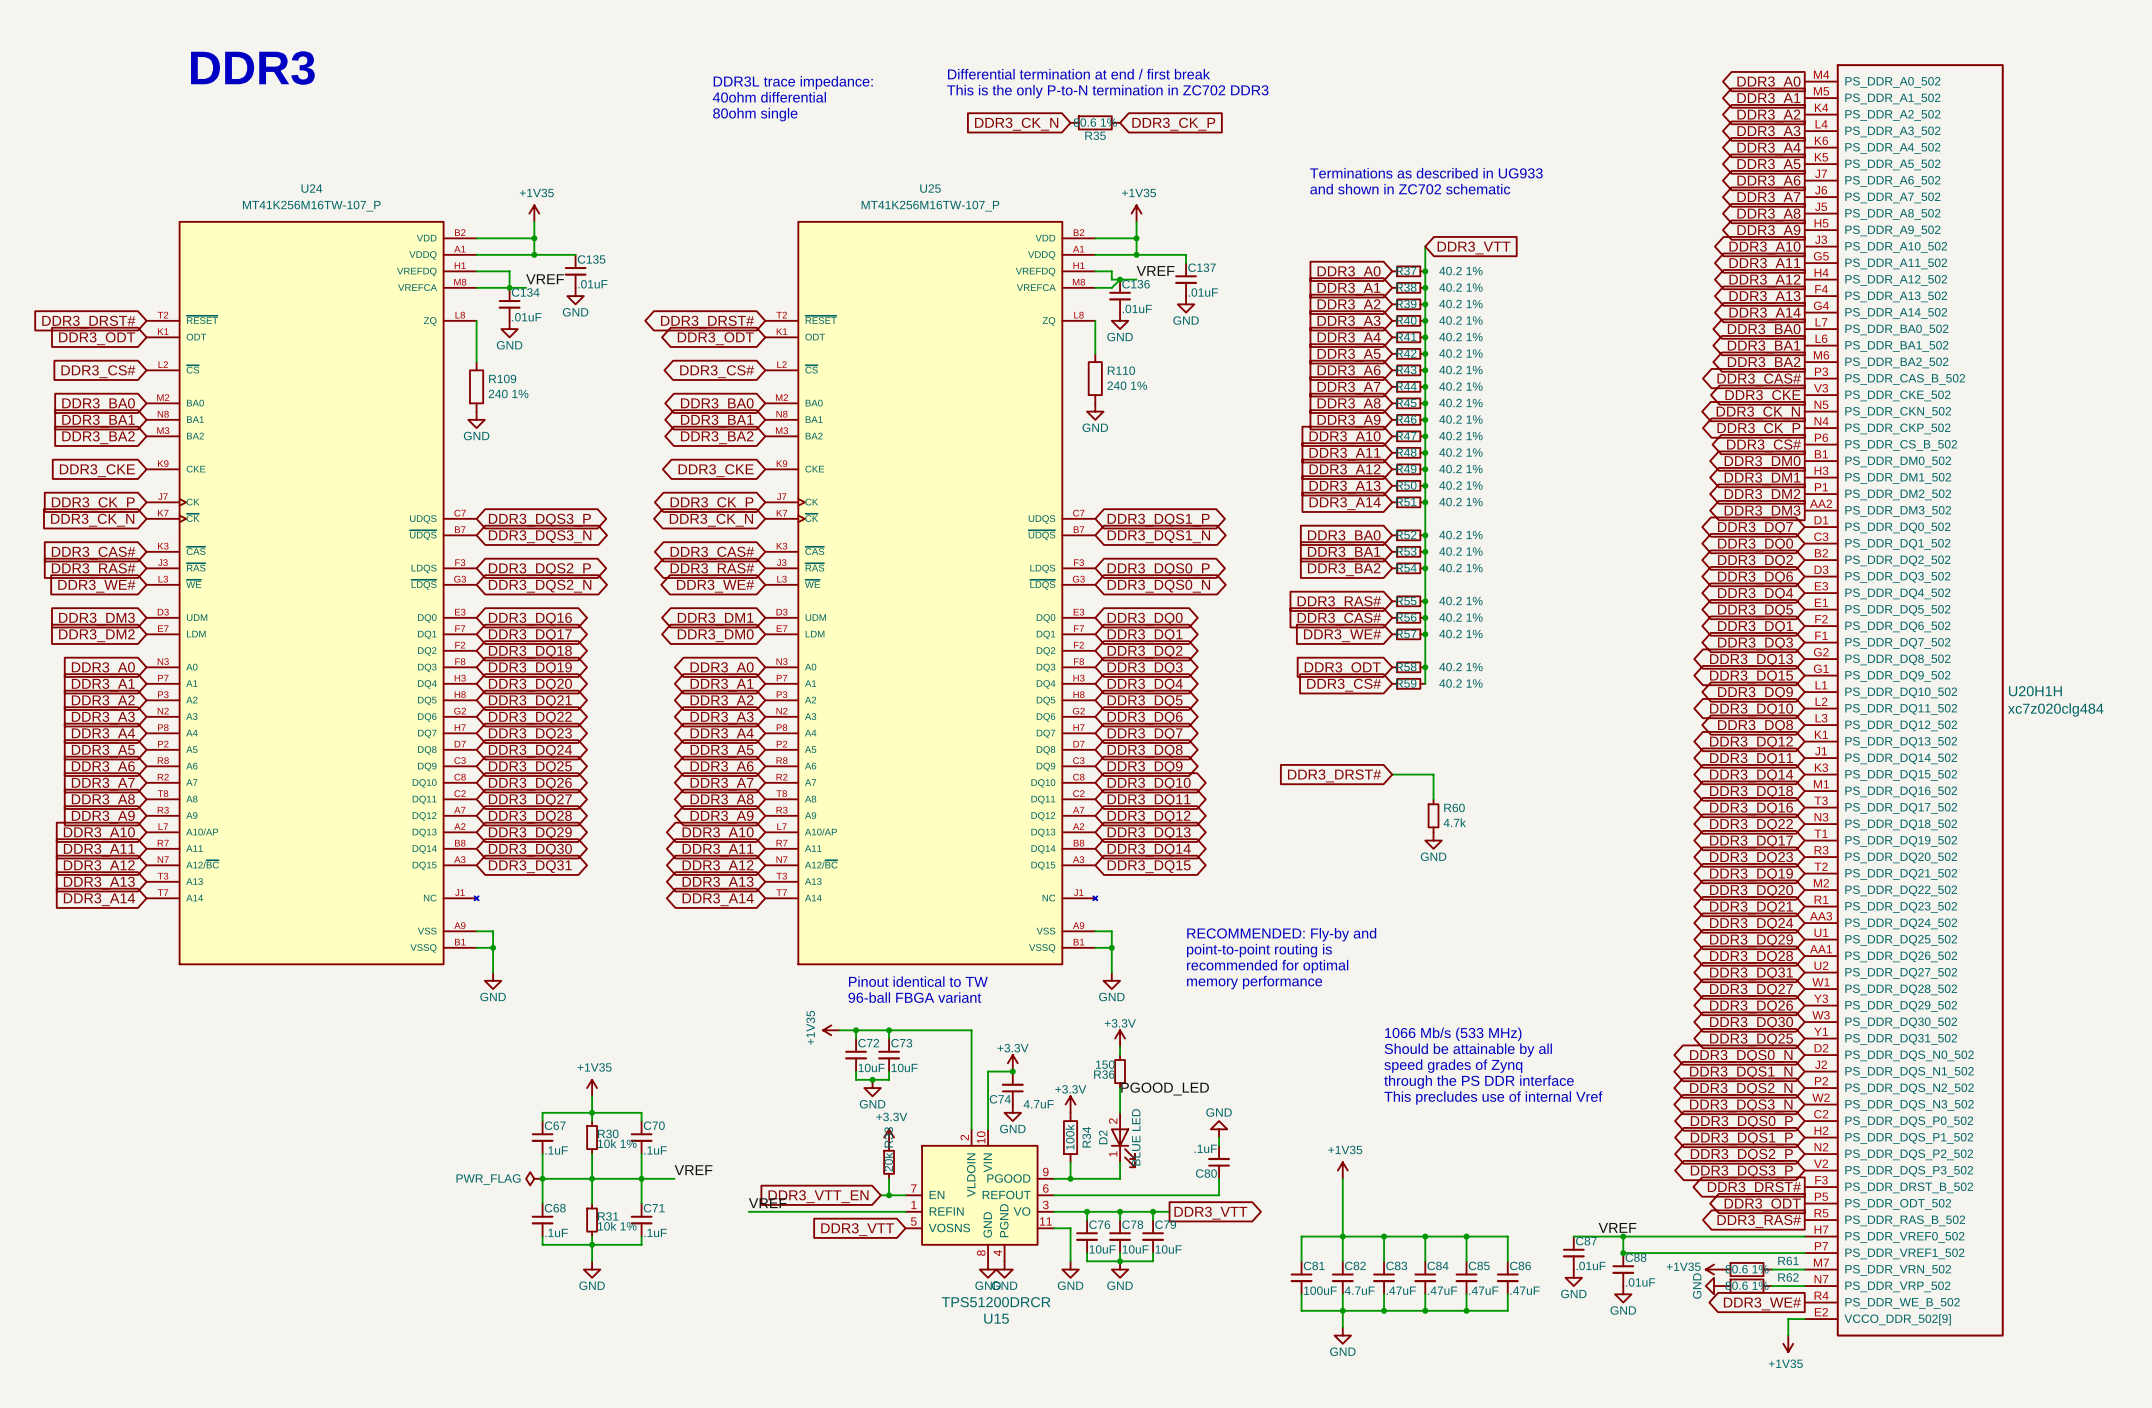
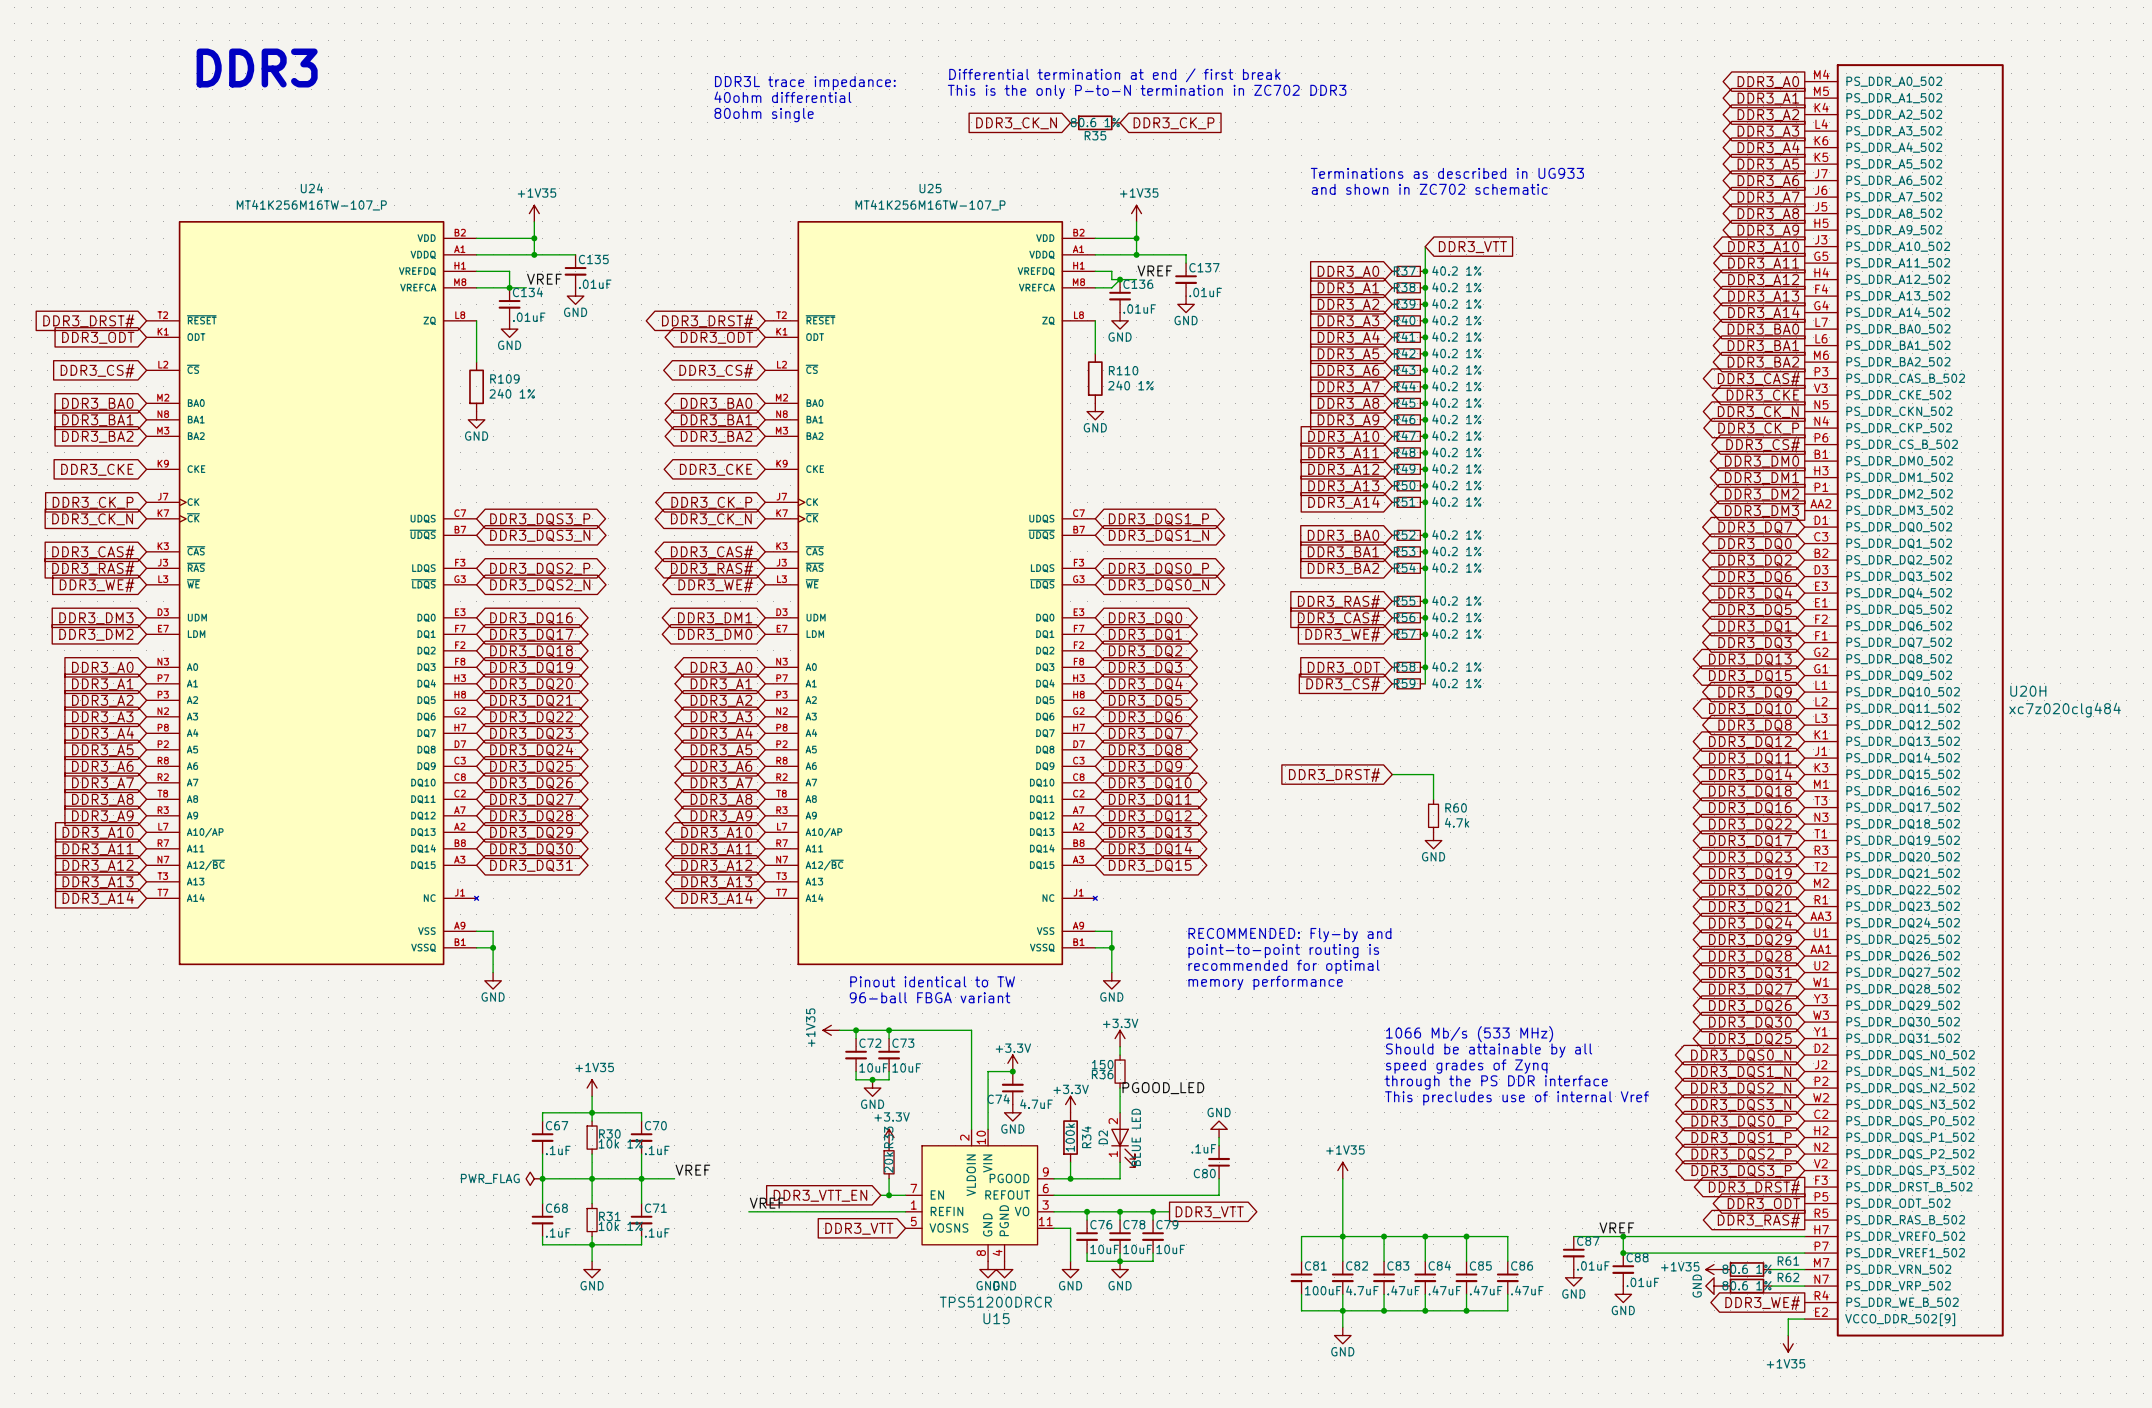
U20H1H name: U20H1H (2035, 691) -> U20H (2028, 691)

